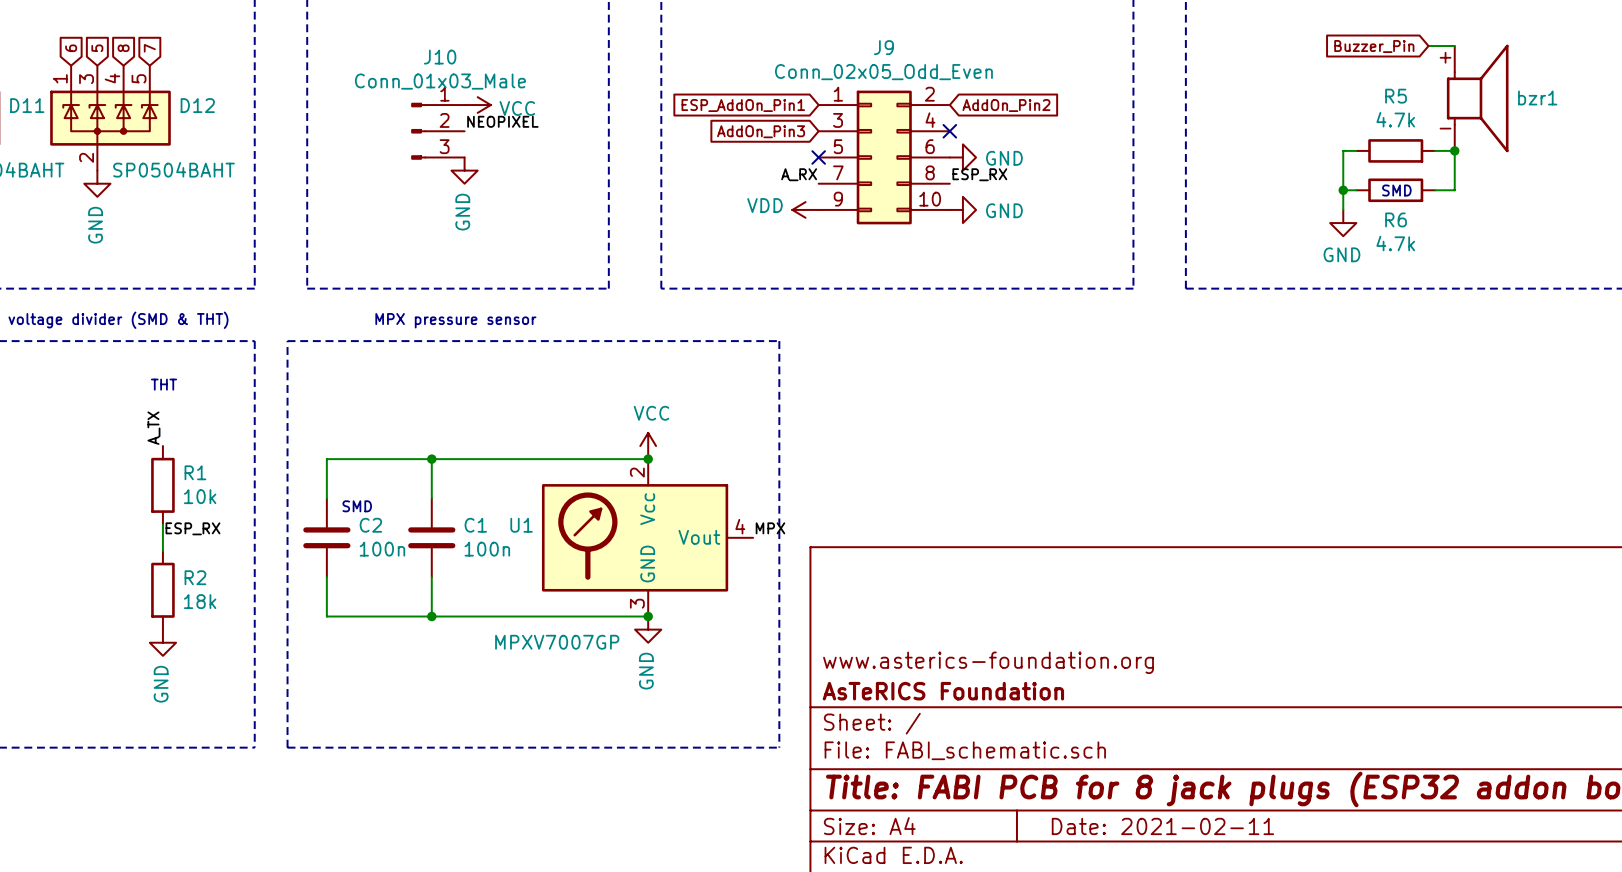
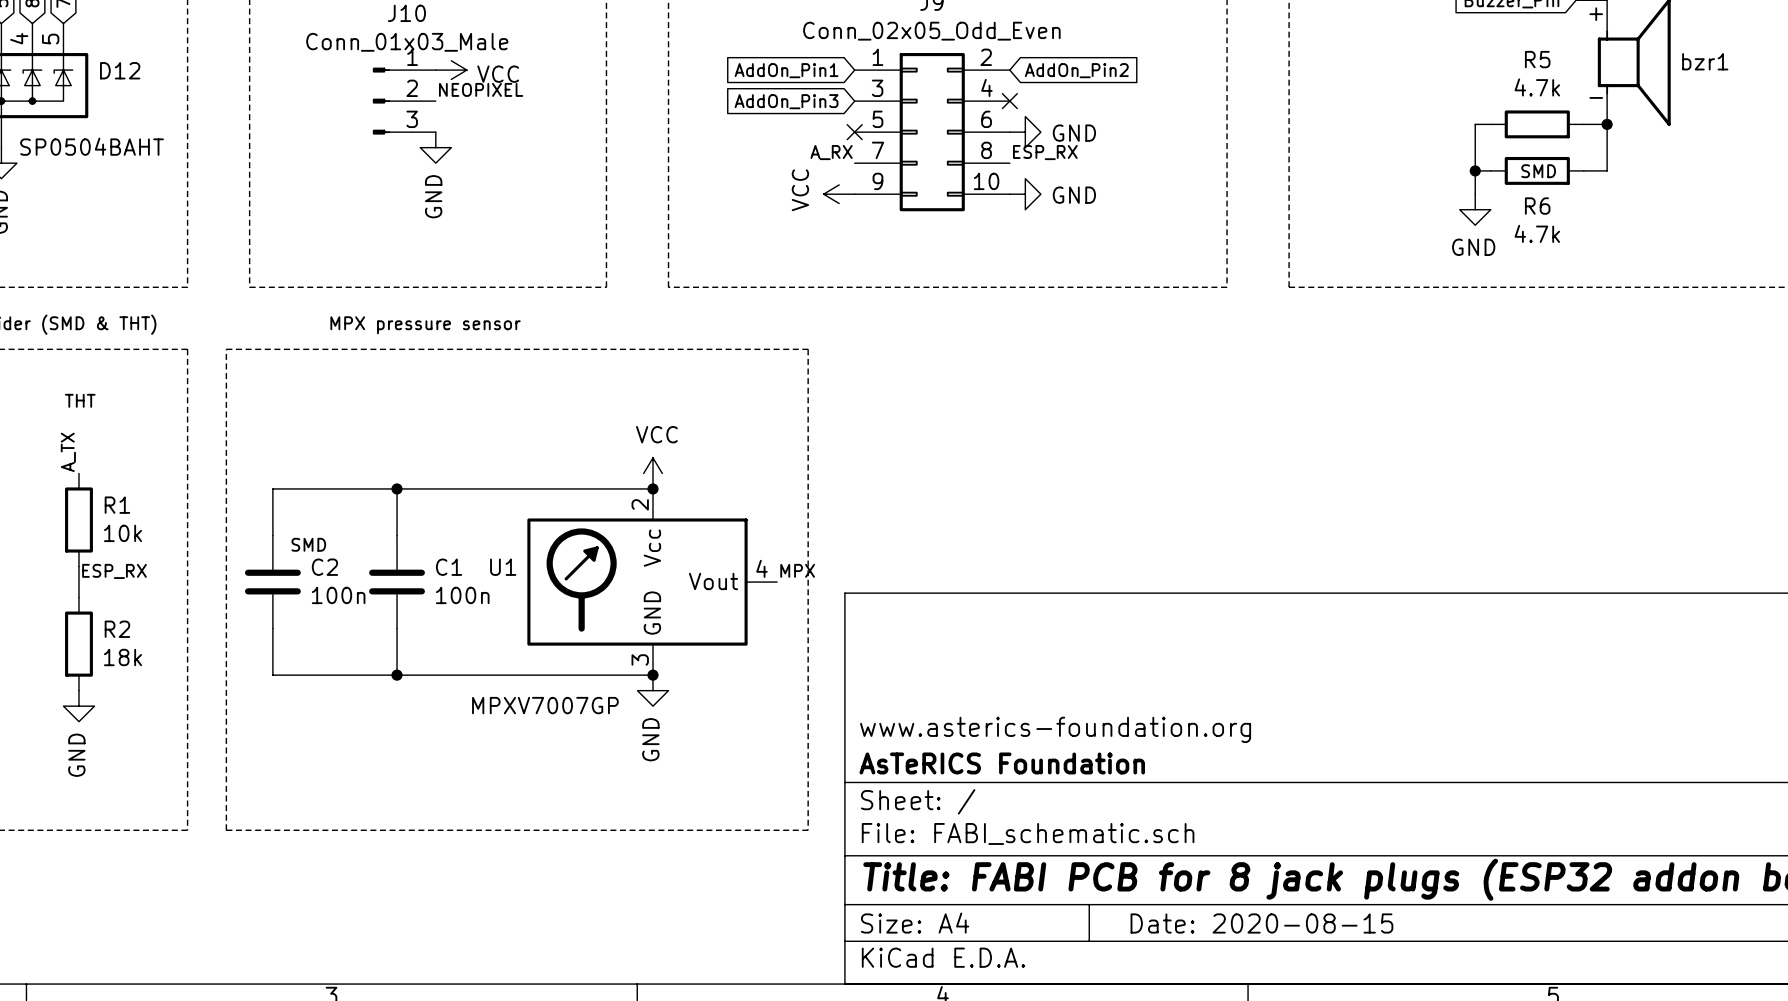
global label: ESP_AddOn_Pin1 (743, 105) -> AddOn_Pin1 (786, 70)
power symbol: VDD (805, 209) -> VCC (839, 194)
title block: Date: 2021-02-11 (1162, 826) -> Date: 2020-08-15 (1261, 923)

